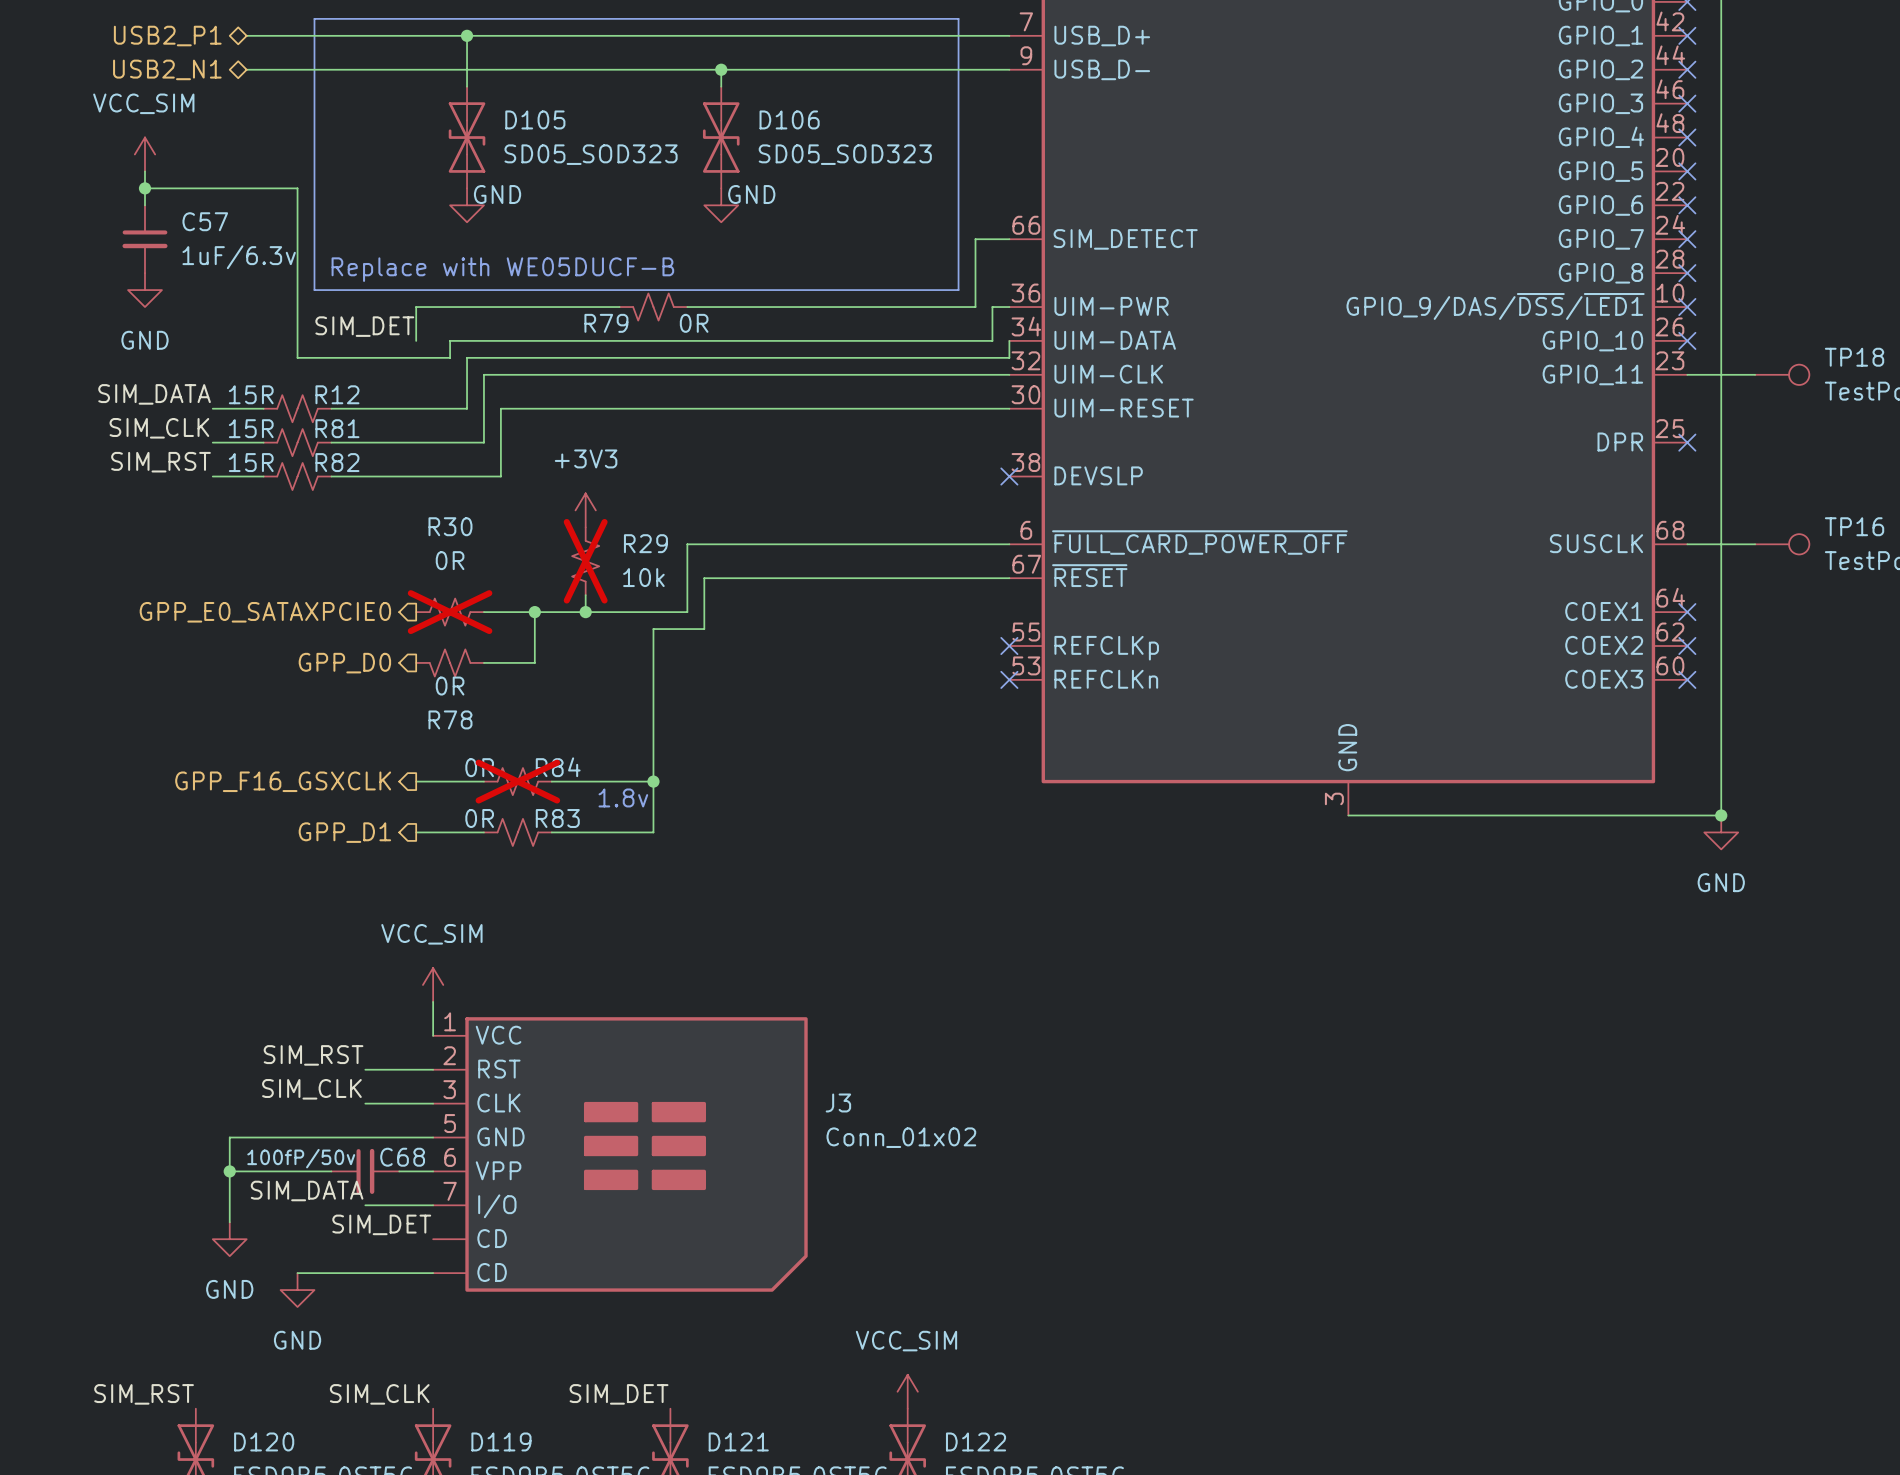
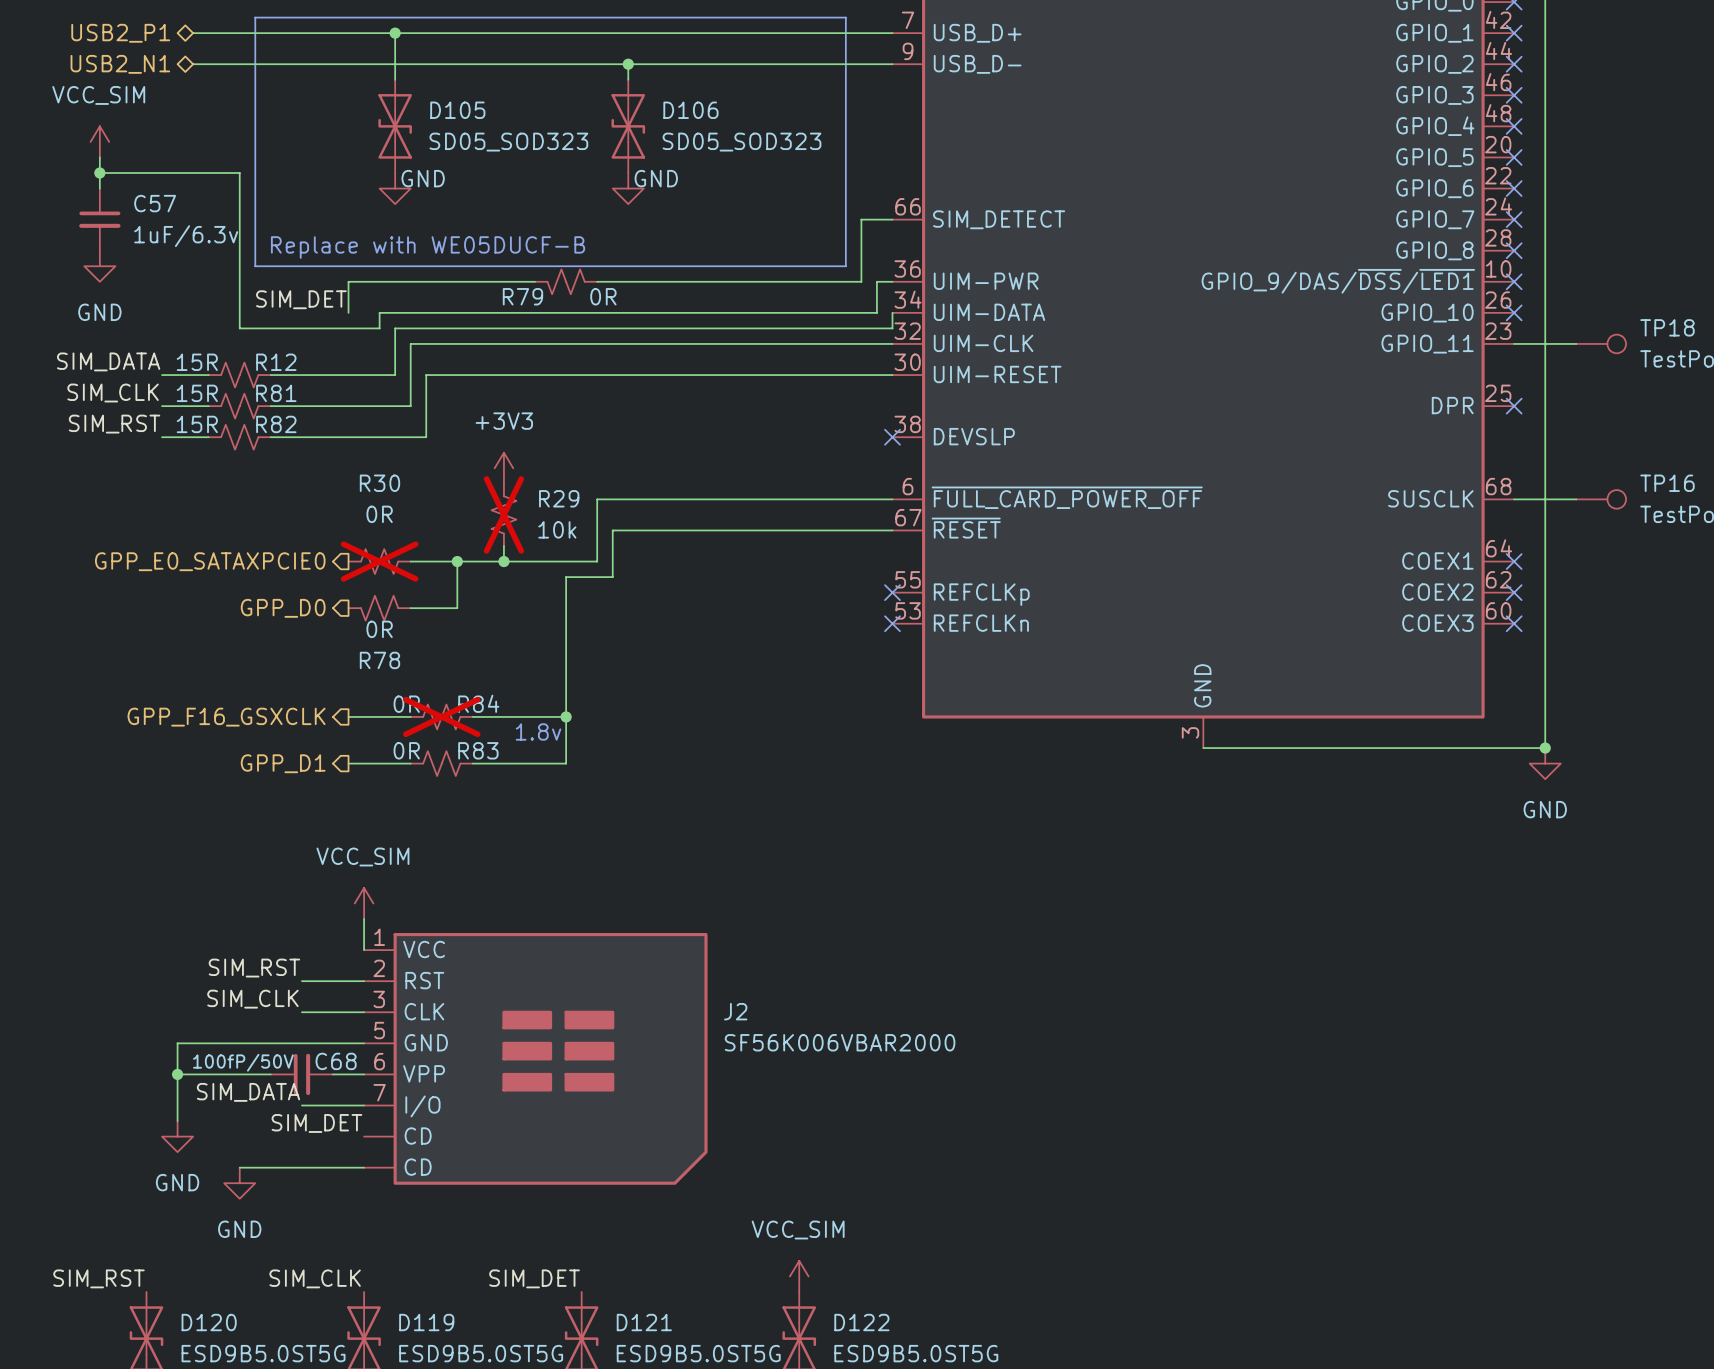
J3 name: J3 (838, 1102) -> J2 (735, 1011)
J3 value: Conn_01x02 (901, 1137) -> SF56K006VBAR2000 (840, 1042)
C68 value: 100fP/50v (301, 1158) -> 100fP/50V (243, 1062)

